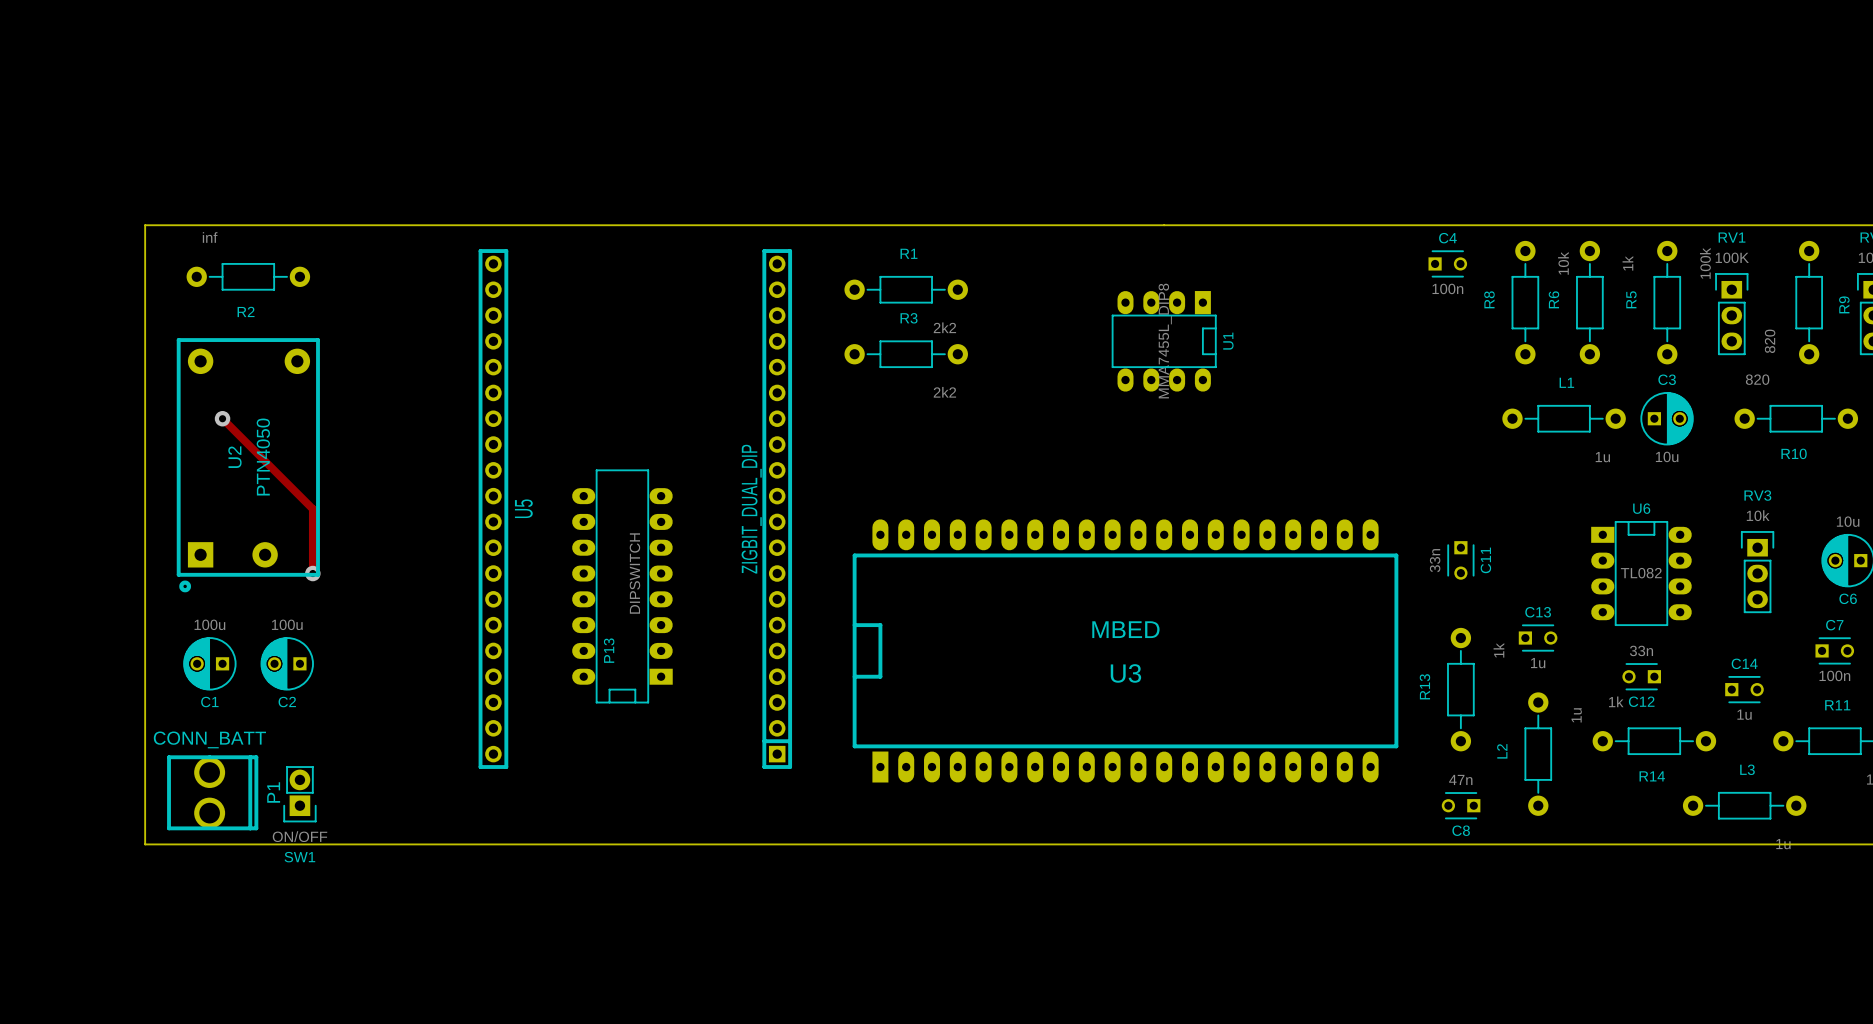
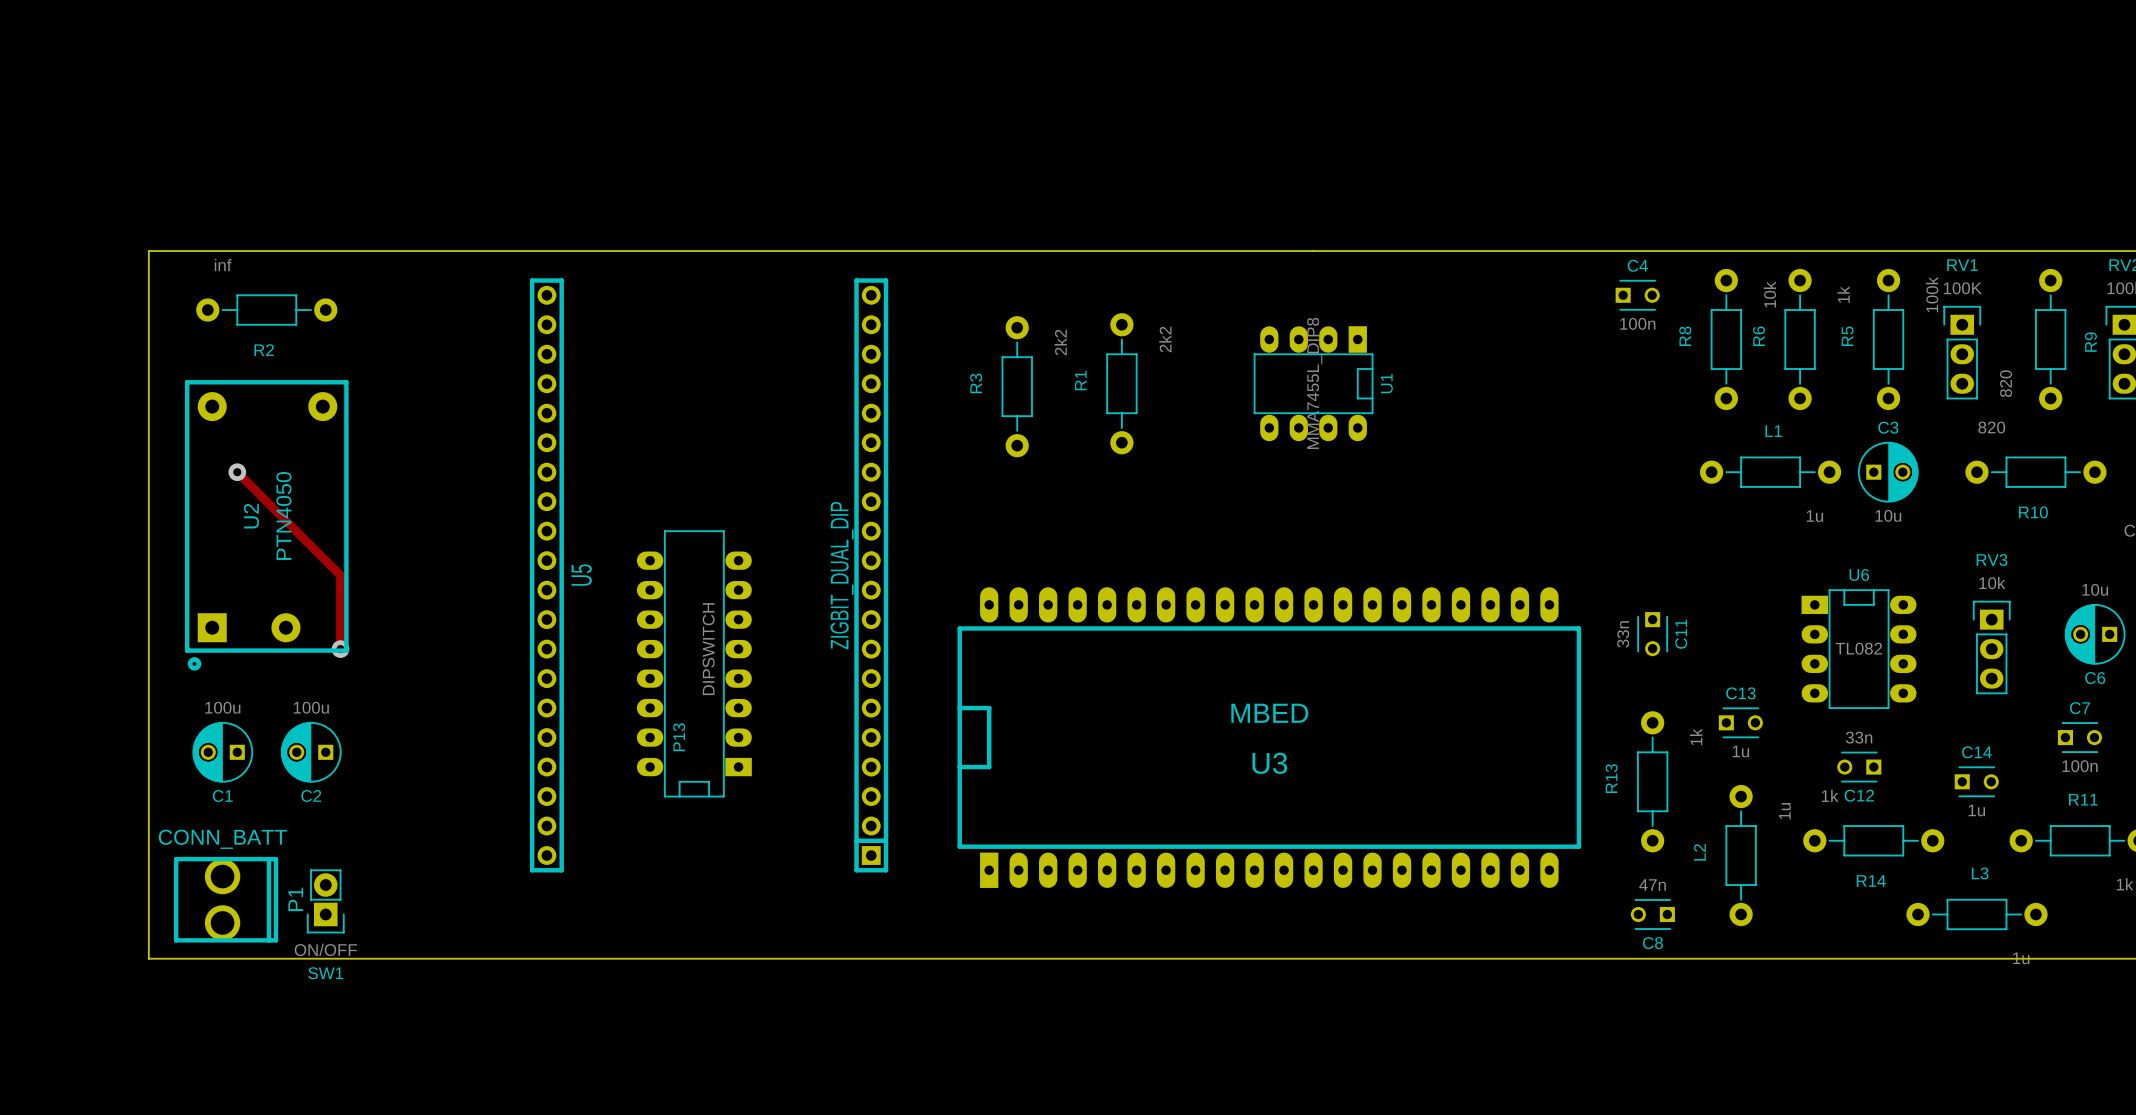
R1 name position: R1 (908, 253) -> R1 (1080, 380)
R1 rotation: 0° (906, 289) -> 90° clockwise (1121, 383)
R1 position: (906, 289) -> (1121, 383)
R3 name position: R3 (909, 318) -> R3 (976, 383)
R1 value position: 2k2 (944, 327) -> 2k2 (1165, 339)
R3 rotation: 0° (906, 354) -> 90° clockwise (1017, 386)
R3 value position: 2k2 (944, 392) -> 2k2 (1060, 342)

